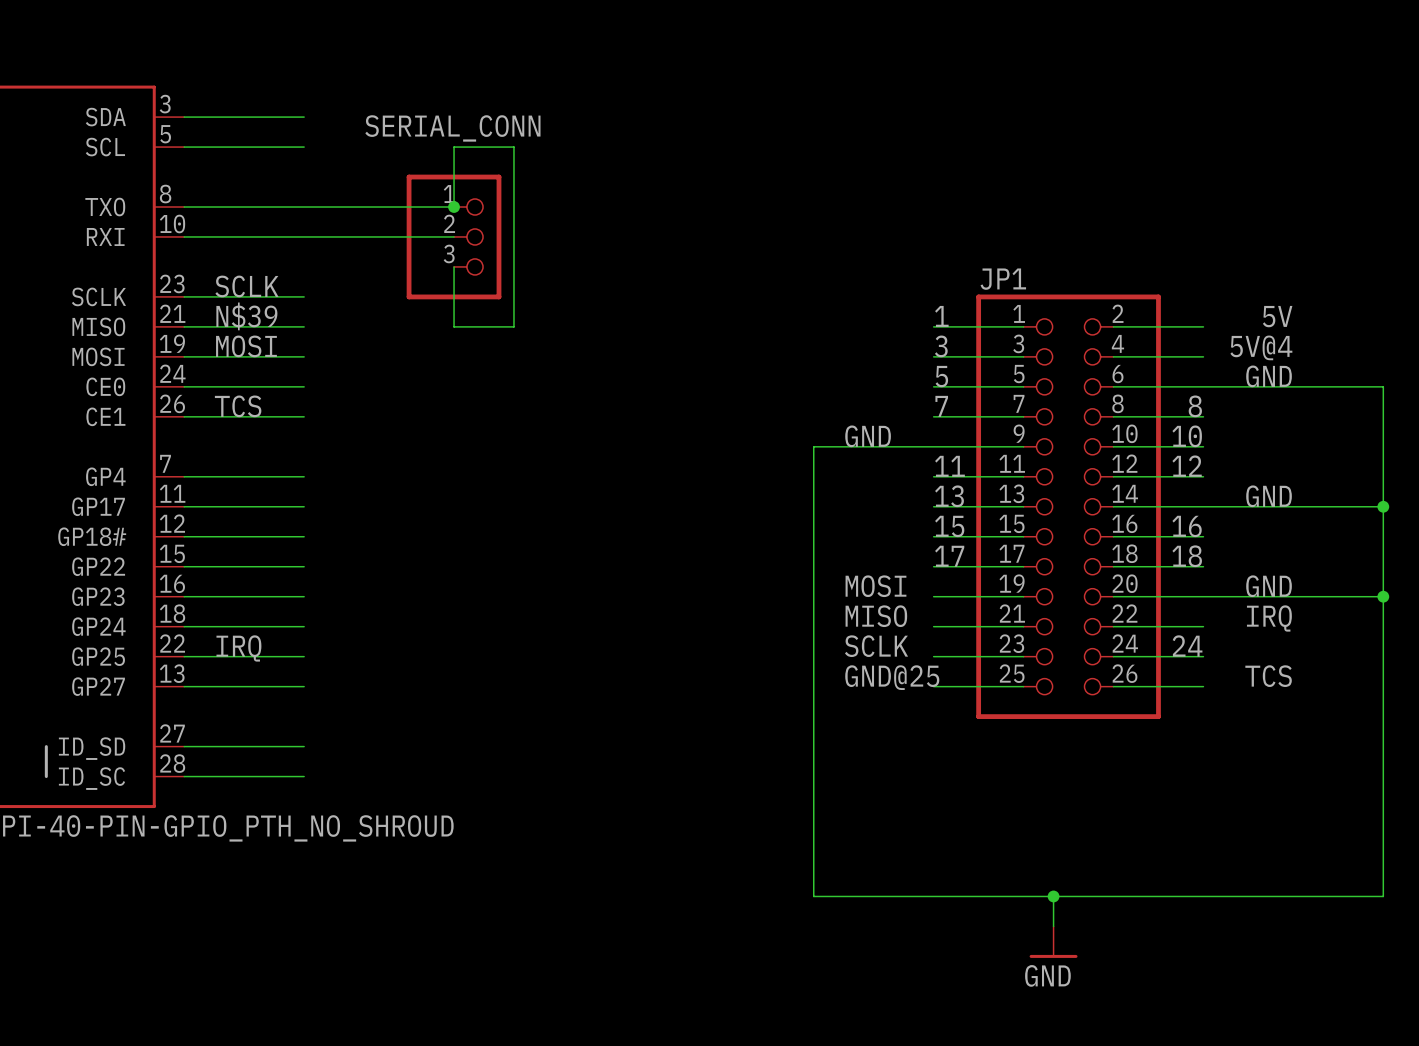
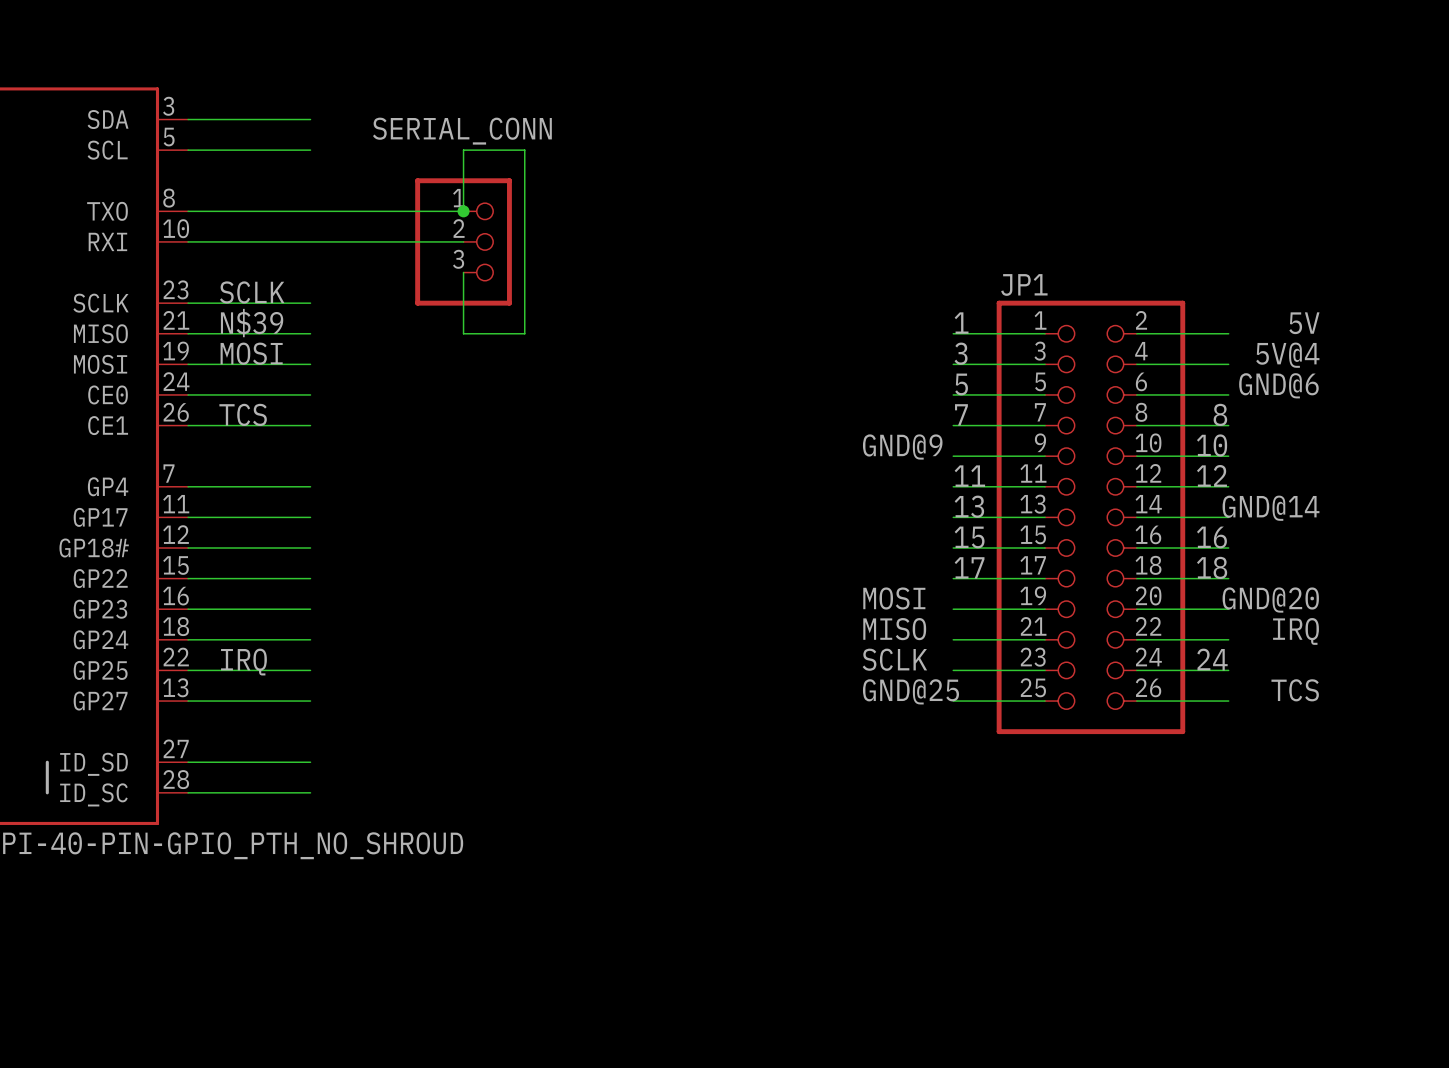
label: GND (1269, 376) -> GND@6 (1278, 385)
wire: (1203, 386) (1383, 386) (1383, 896) (813, 896) (813, 446) (933, 446) -> none
label: GND (868, 436) -> GND@9 (902, 447)
label: GND (1269, 496) -> GND@14 (1271, 508)
wire: (1203, 506) (1383, 506) -> none
junction: (1383, 506) -> none
label: GND (1269, 586) -> GND@20 (1270, 600)
wire: (1203, 596) (1383, 596) -> none
junction: (1383, 596) -> none
wire: (1053, 896) (1053, 926) -> none
junction: (1053, 896) -> none
power symbol: GND (1053, 942) -> none

